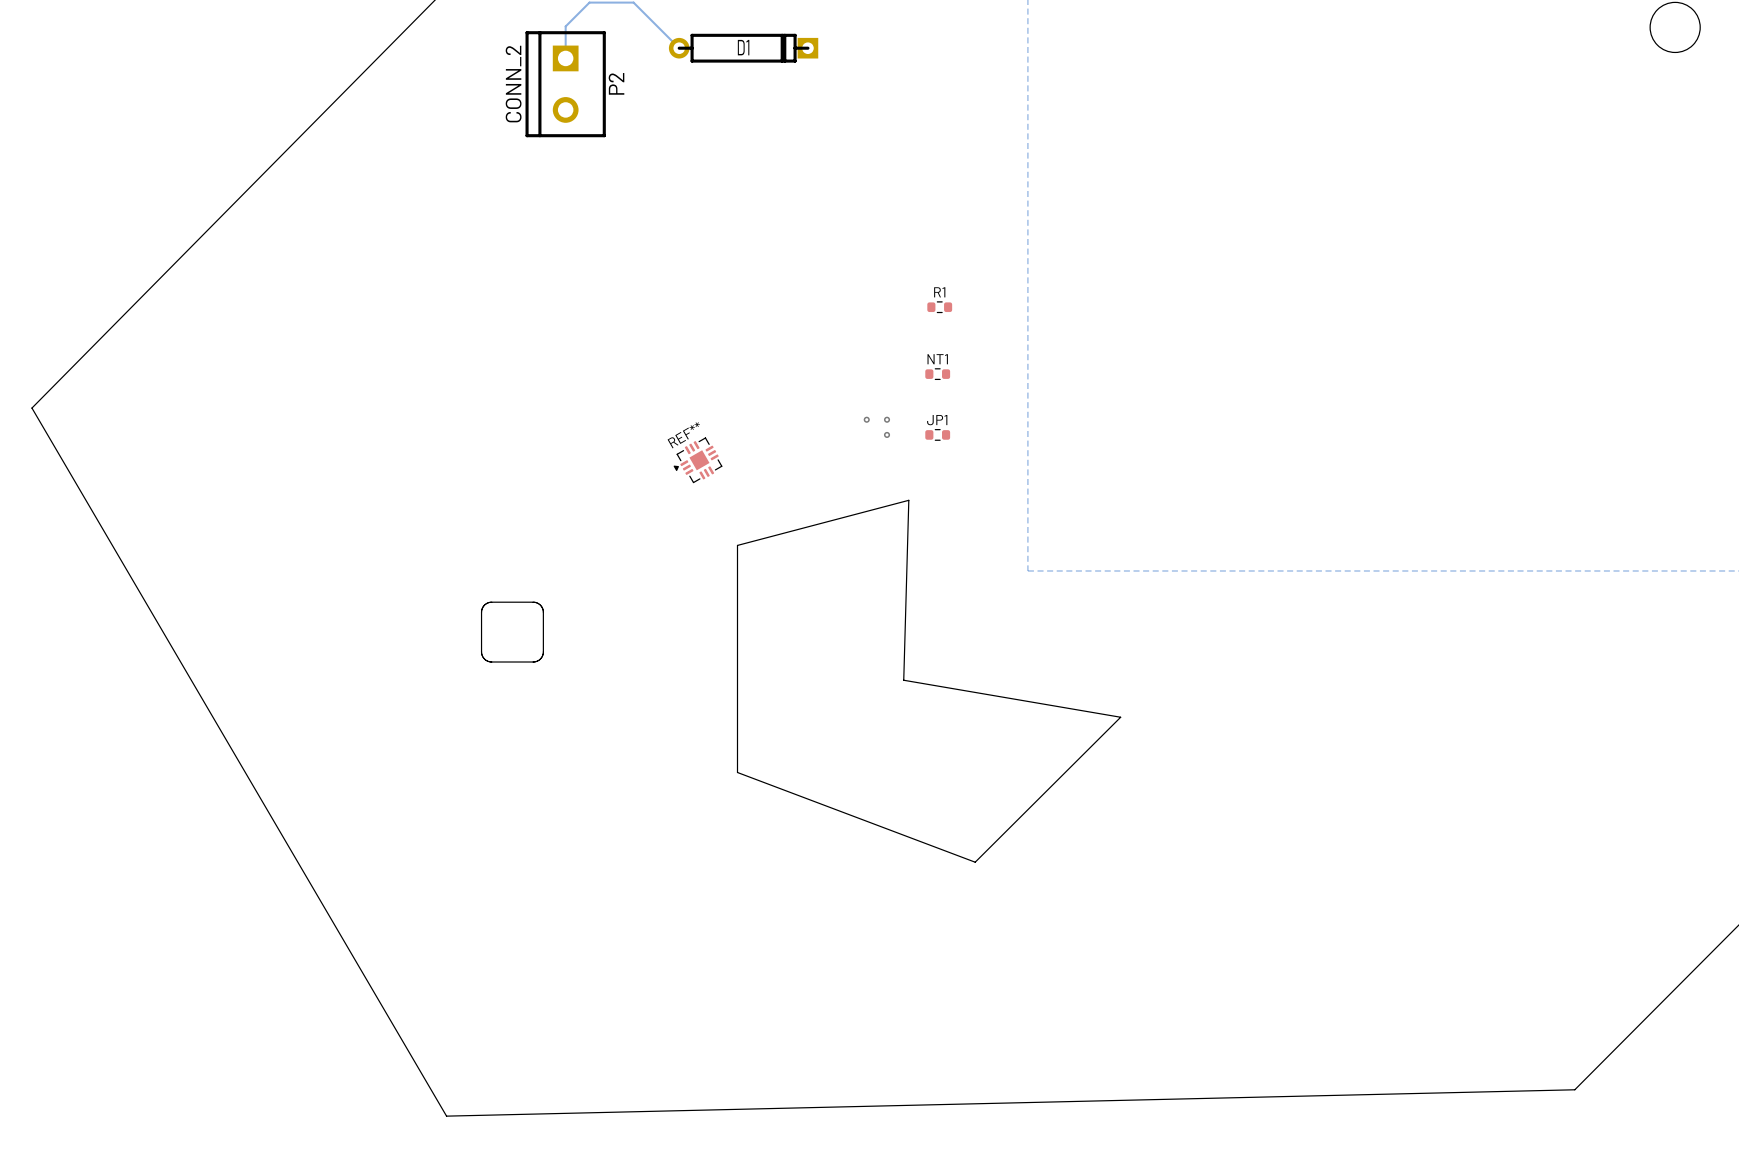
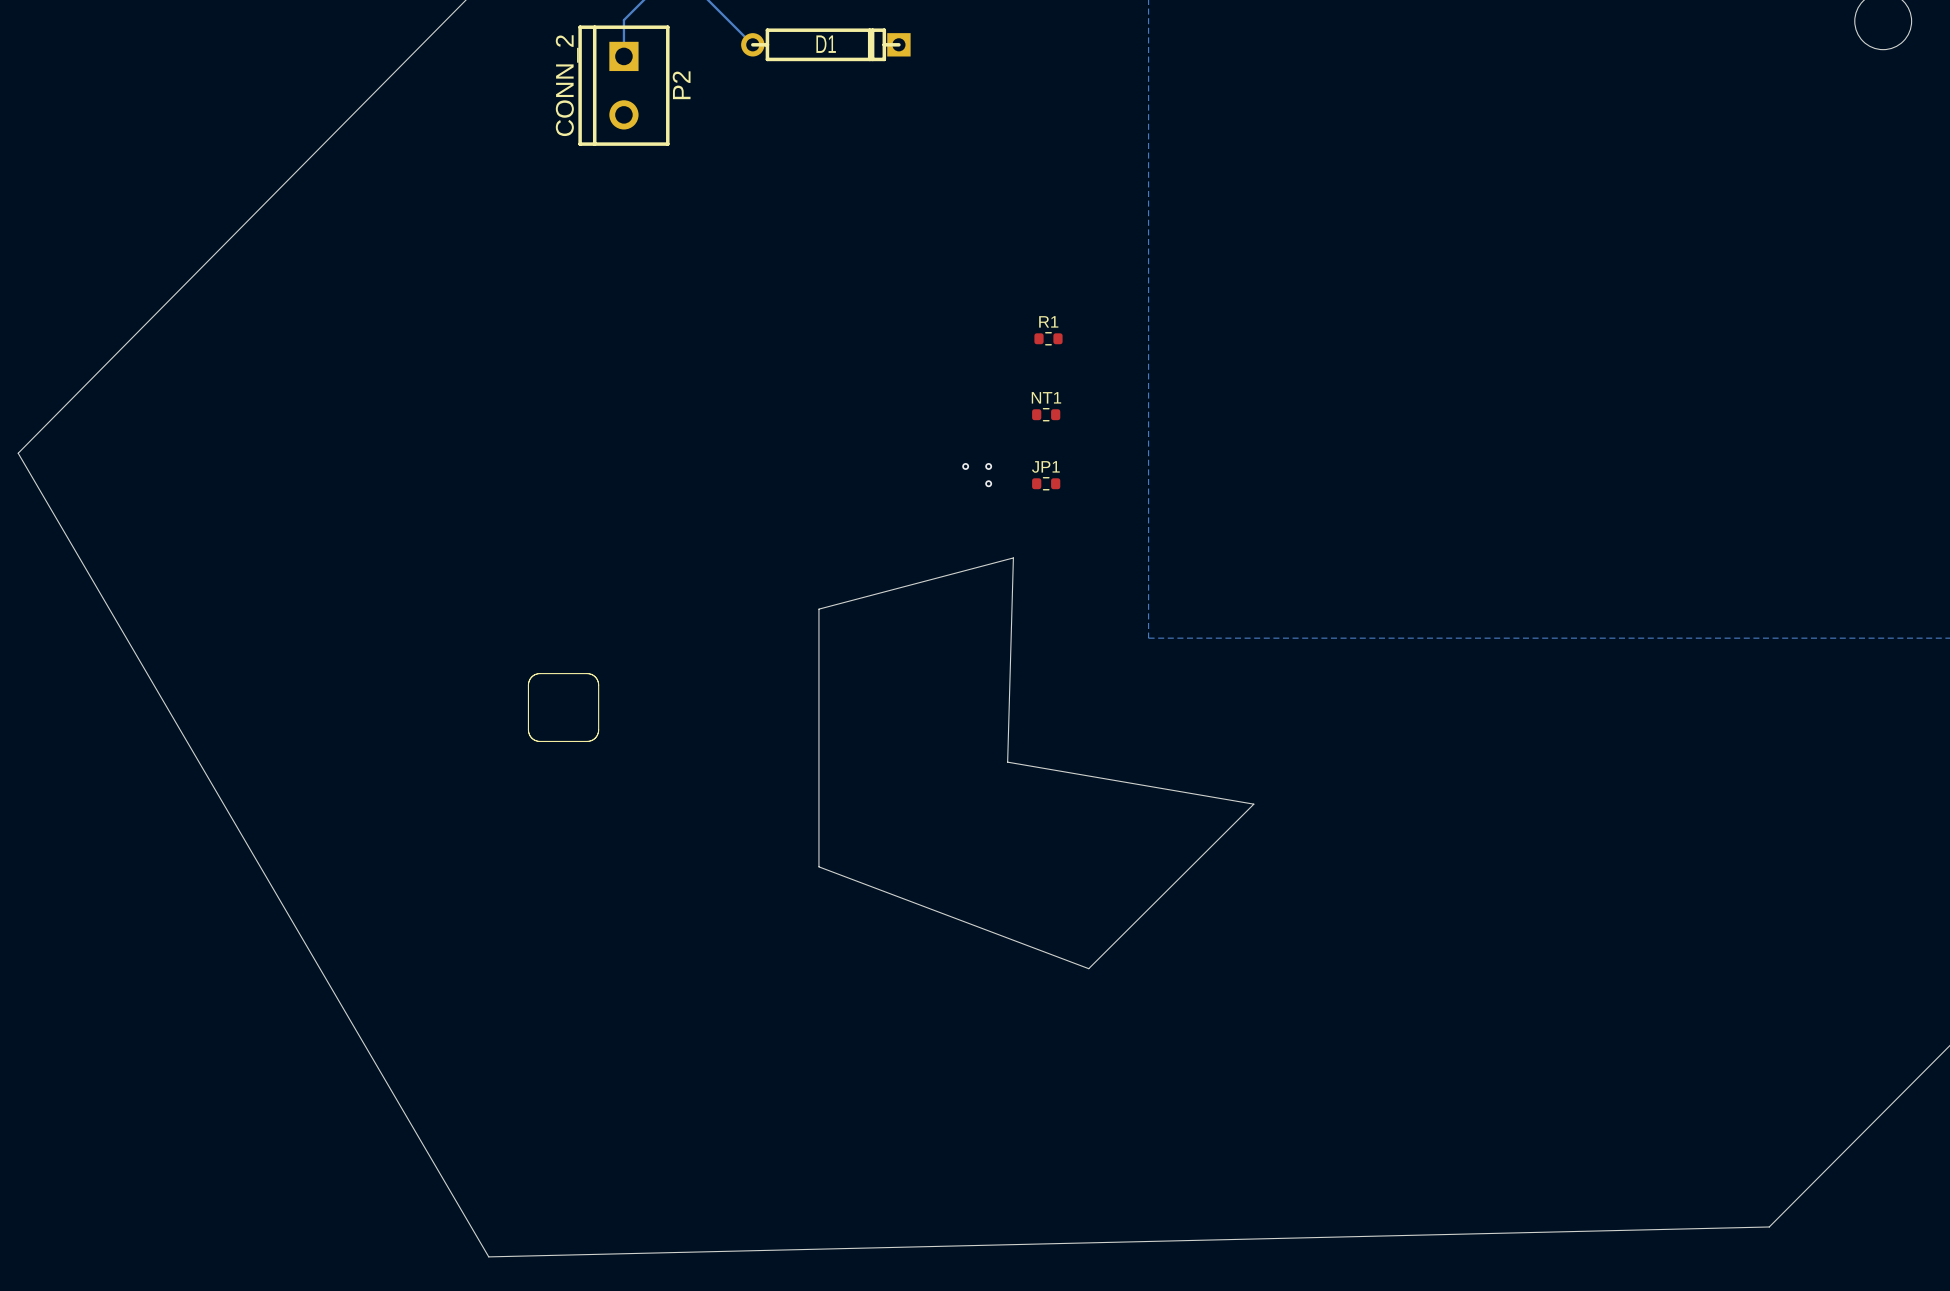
REF**: (698, 460) -> none

